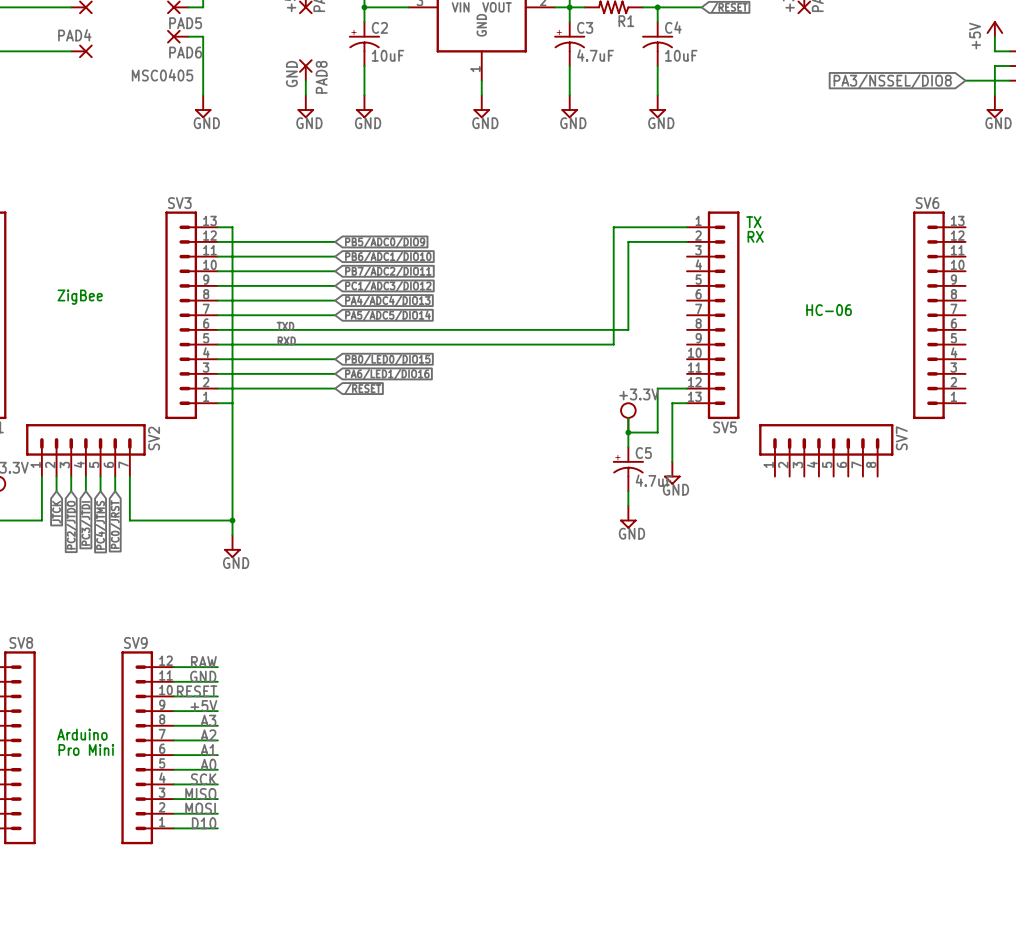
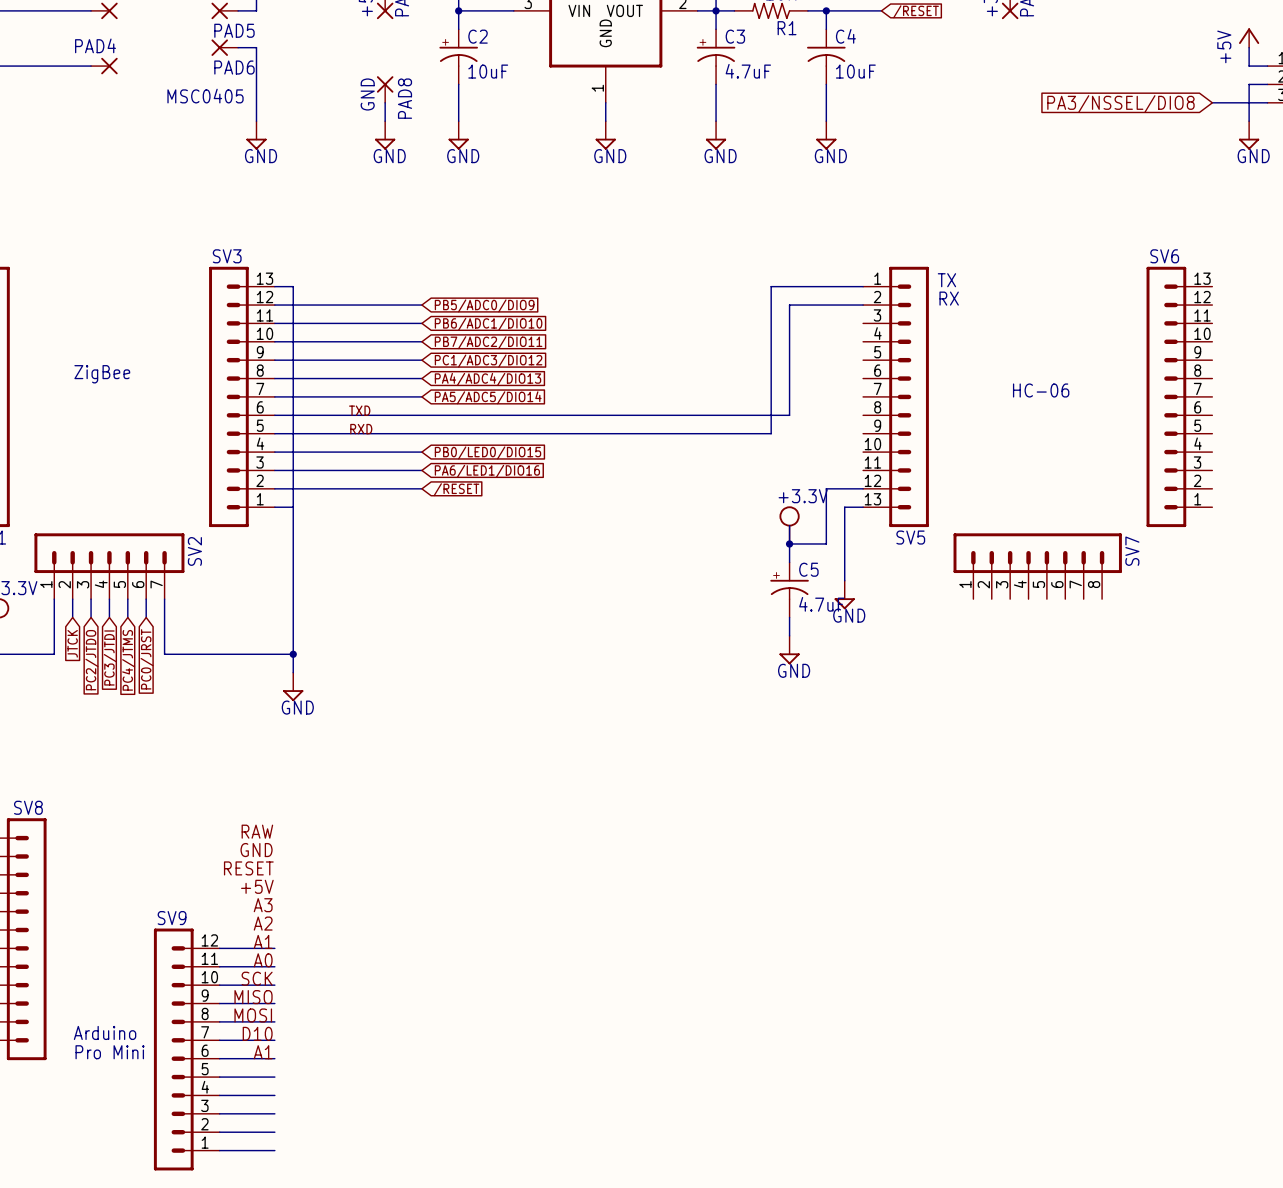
wire: (173, 667) (217, 667) -> none
wire: (173, 681) (217, 681) -> none
wire: (173, 696) (217, 696) -> none
wire: (173, 711) (217, 711) -> (219, 1058) (274, 1058)
wire: (173, 725) (217, 725) -> (219, 1077) (274, 1077)
text position: Arduino (82, 734) -> Arduino (105, 1032)
wire: (173, 740) (217, 740) -> (219, 1095) (274, 1095)
SV9 position: (147, 747) -> (186, 1049)
text position: Pro Mini (86, 749) -> Pro Mini (110, 1052)
label: none -> A1 (263, 1052)
wire: none -> (219, 1113) (274, 1113)
wire: none -> (219, 1132) (274, 1132)
wire: none -> (219, 1150) (274, 1150)

